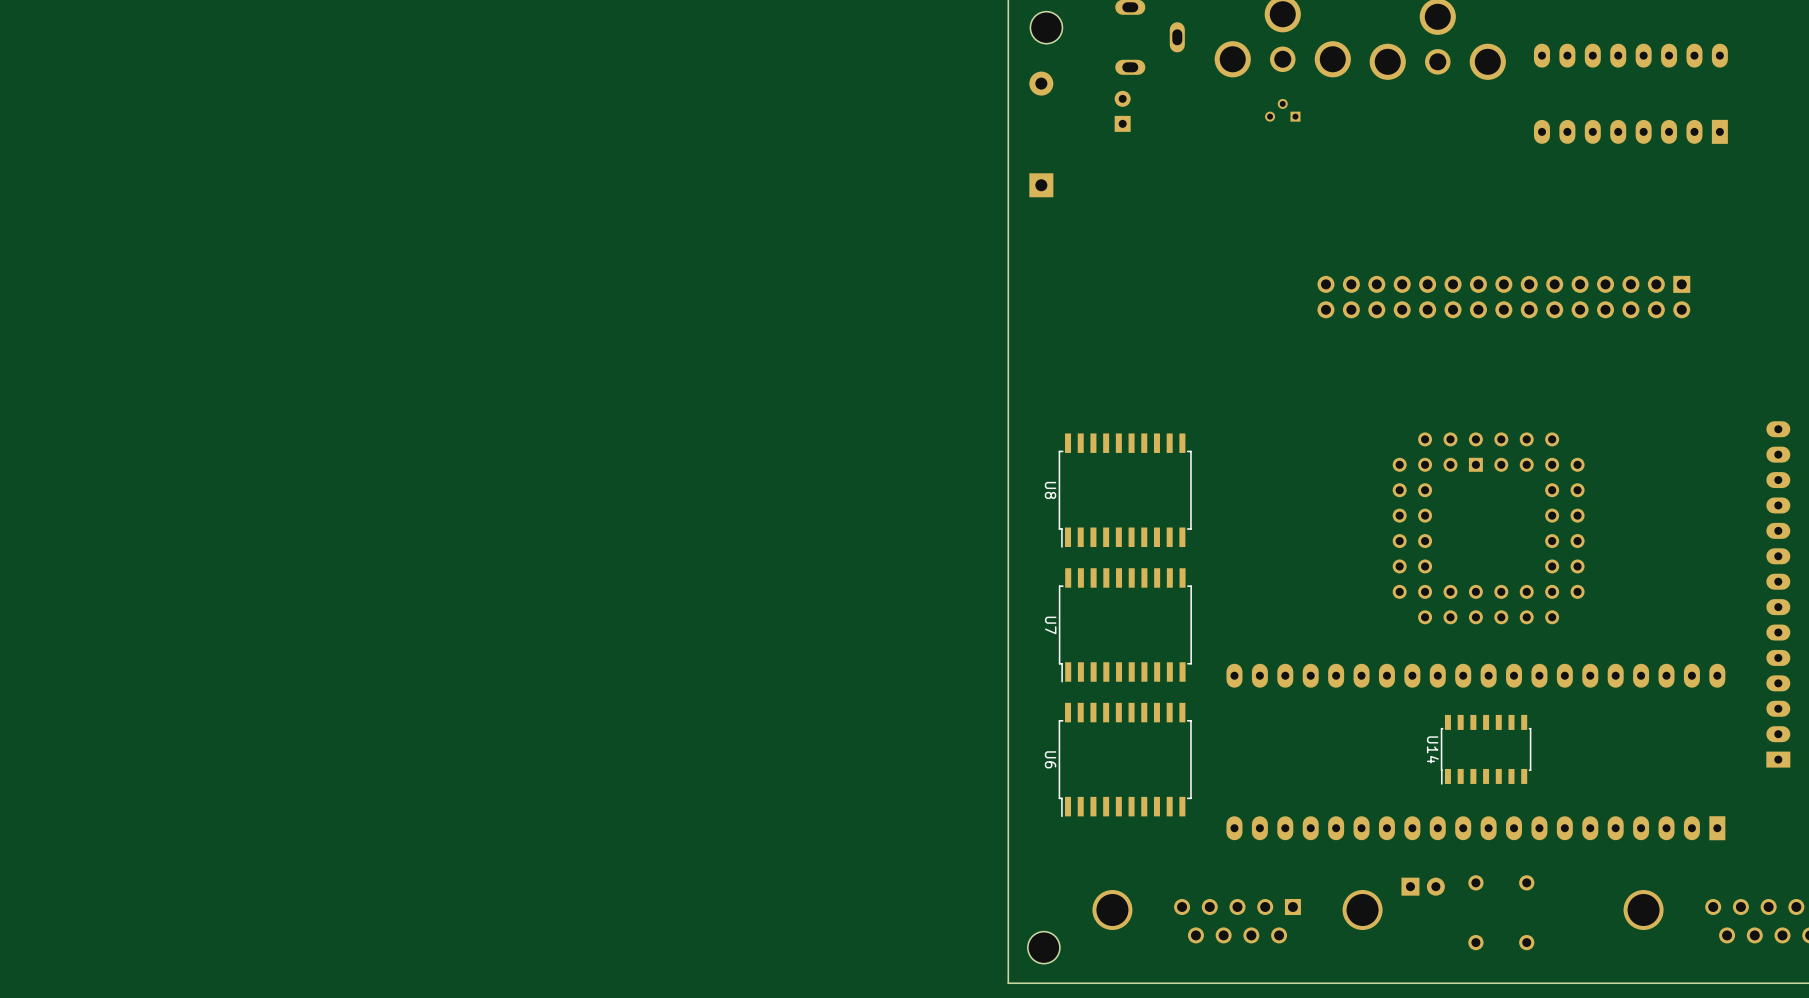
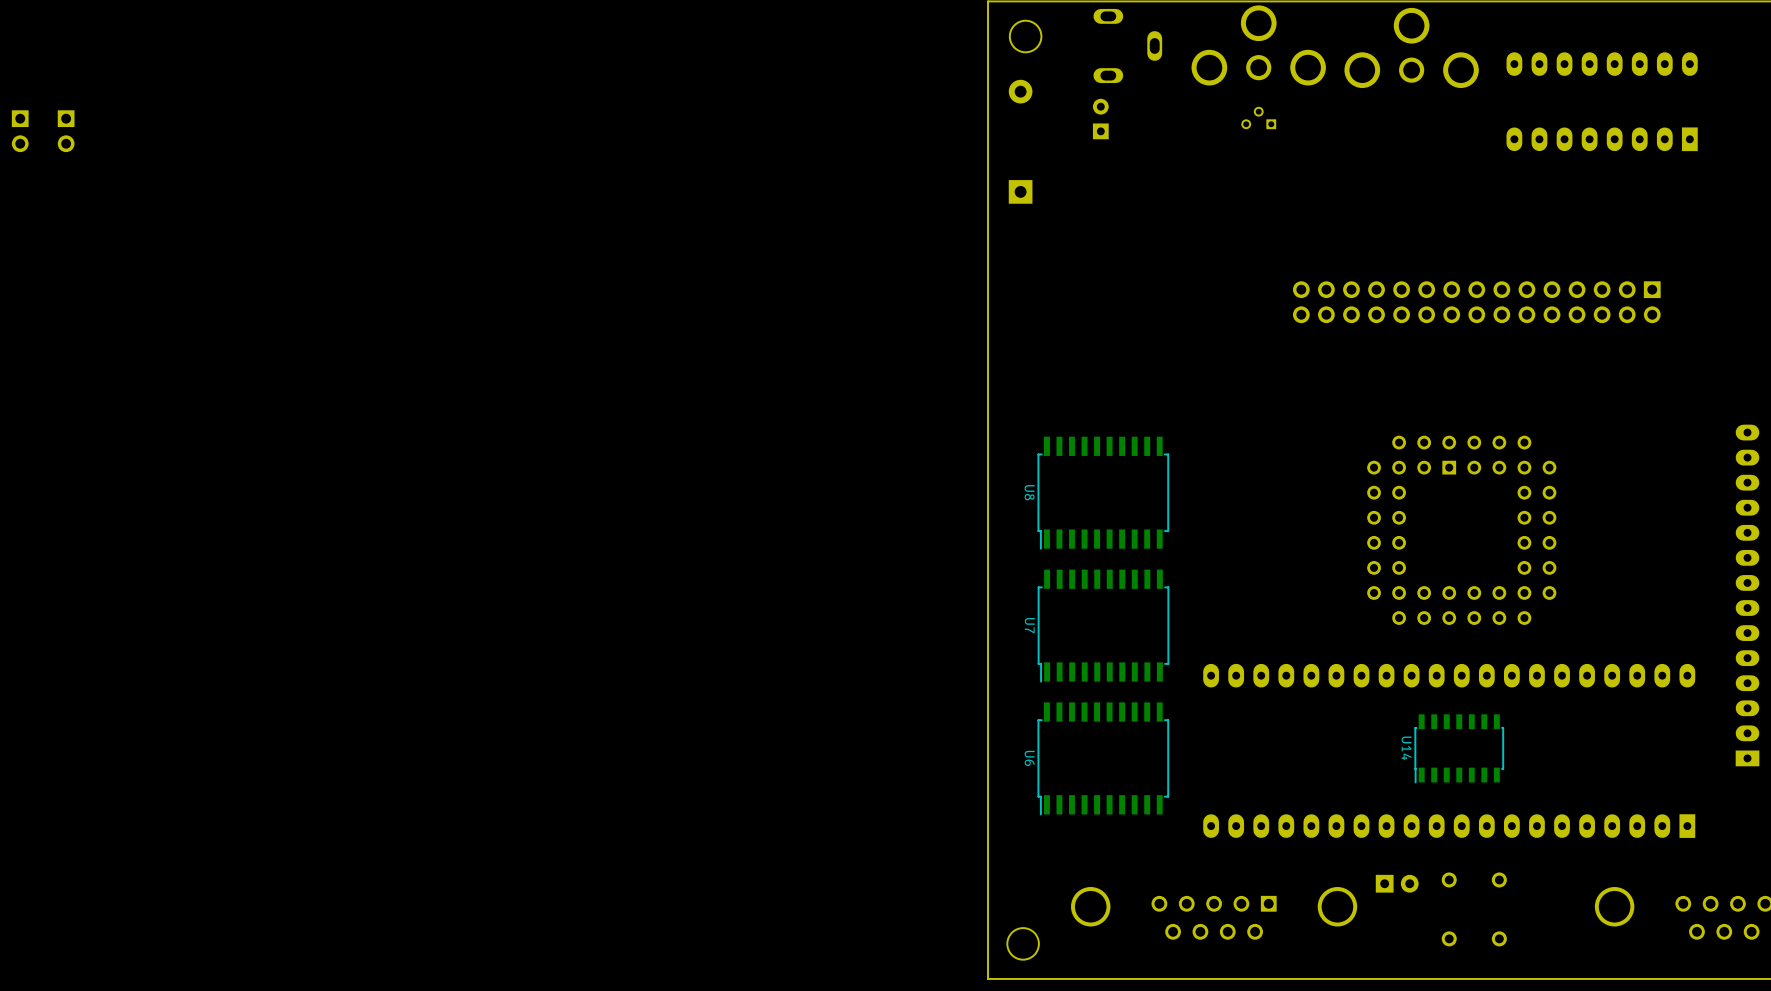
part: none -> (20, 131)
part: none -> (66, 131)

